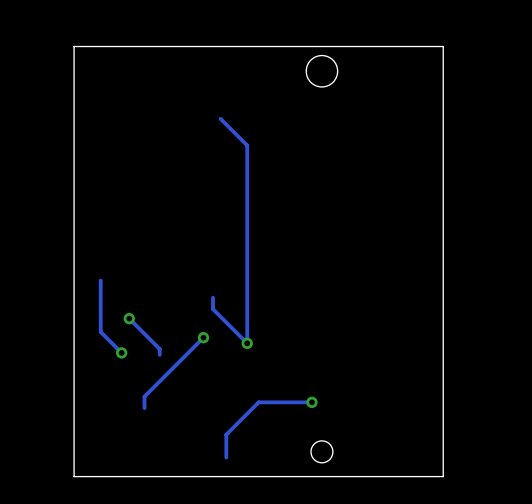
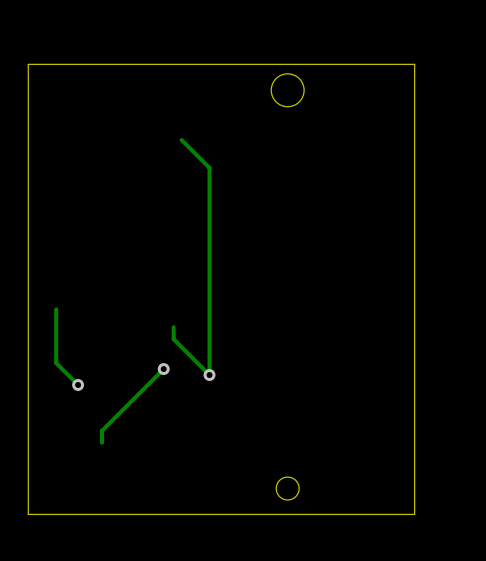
track: (129, 318) (159, 349) (159, 354) -> none
via: (129, 318) -> none
track: (311, 402) (258, 402) (226, 434) (226, 457) -> none
via: (311, 402) -> none

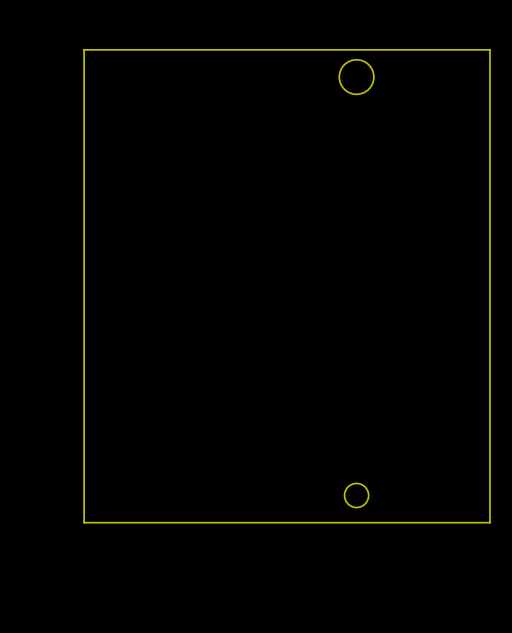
track: (181, 140) (209, 167) (209, 375) (173, 339) (173, 327) -> none
track: (56, 309) (56, 363) (78, 384) -> none
track: (163, 369) (101, 430) (101, 442) -> none
via: (163, 369) -> none
via: (209, 375) -> none
via: (78, 384) -> none

